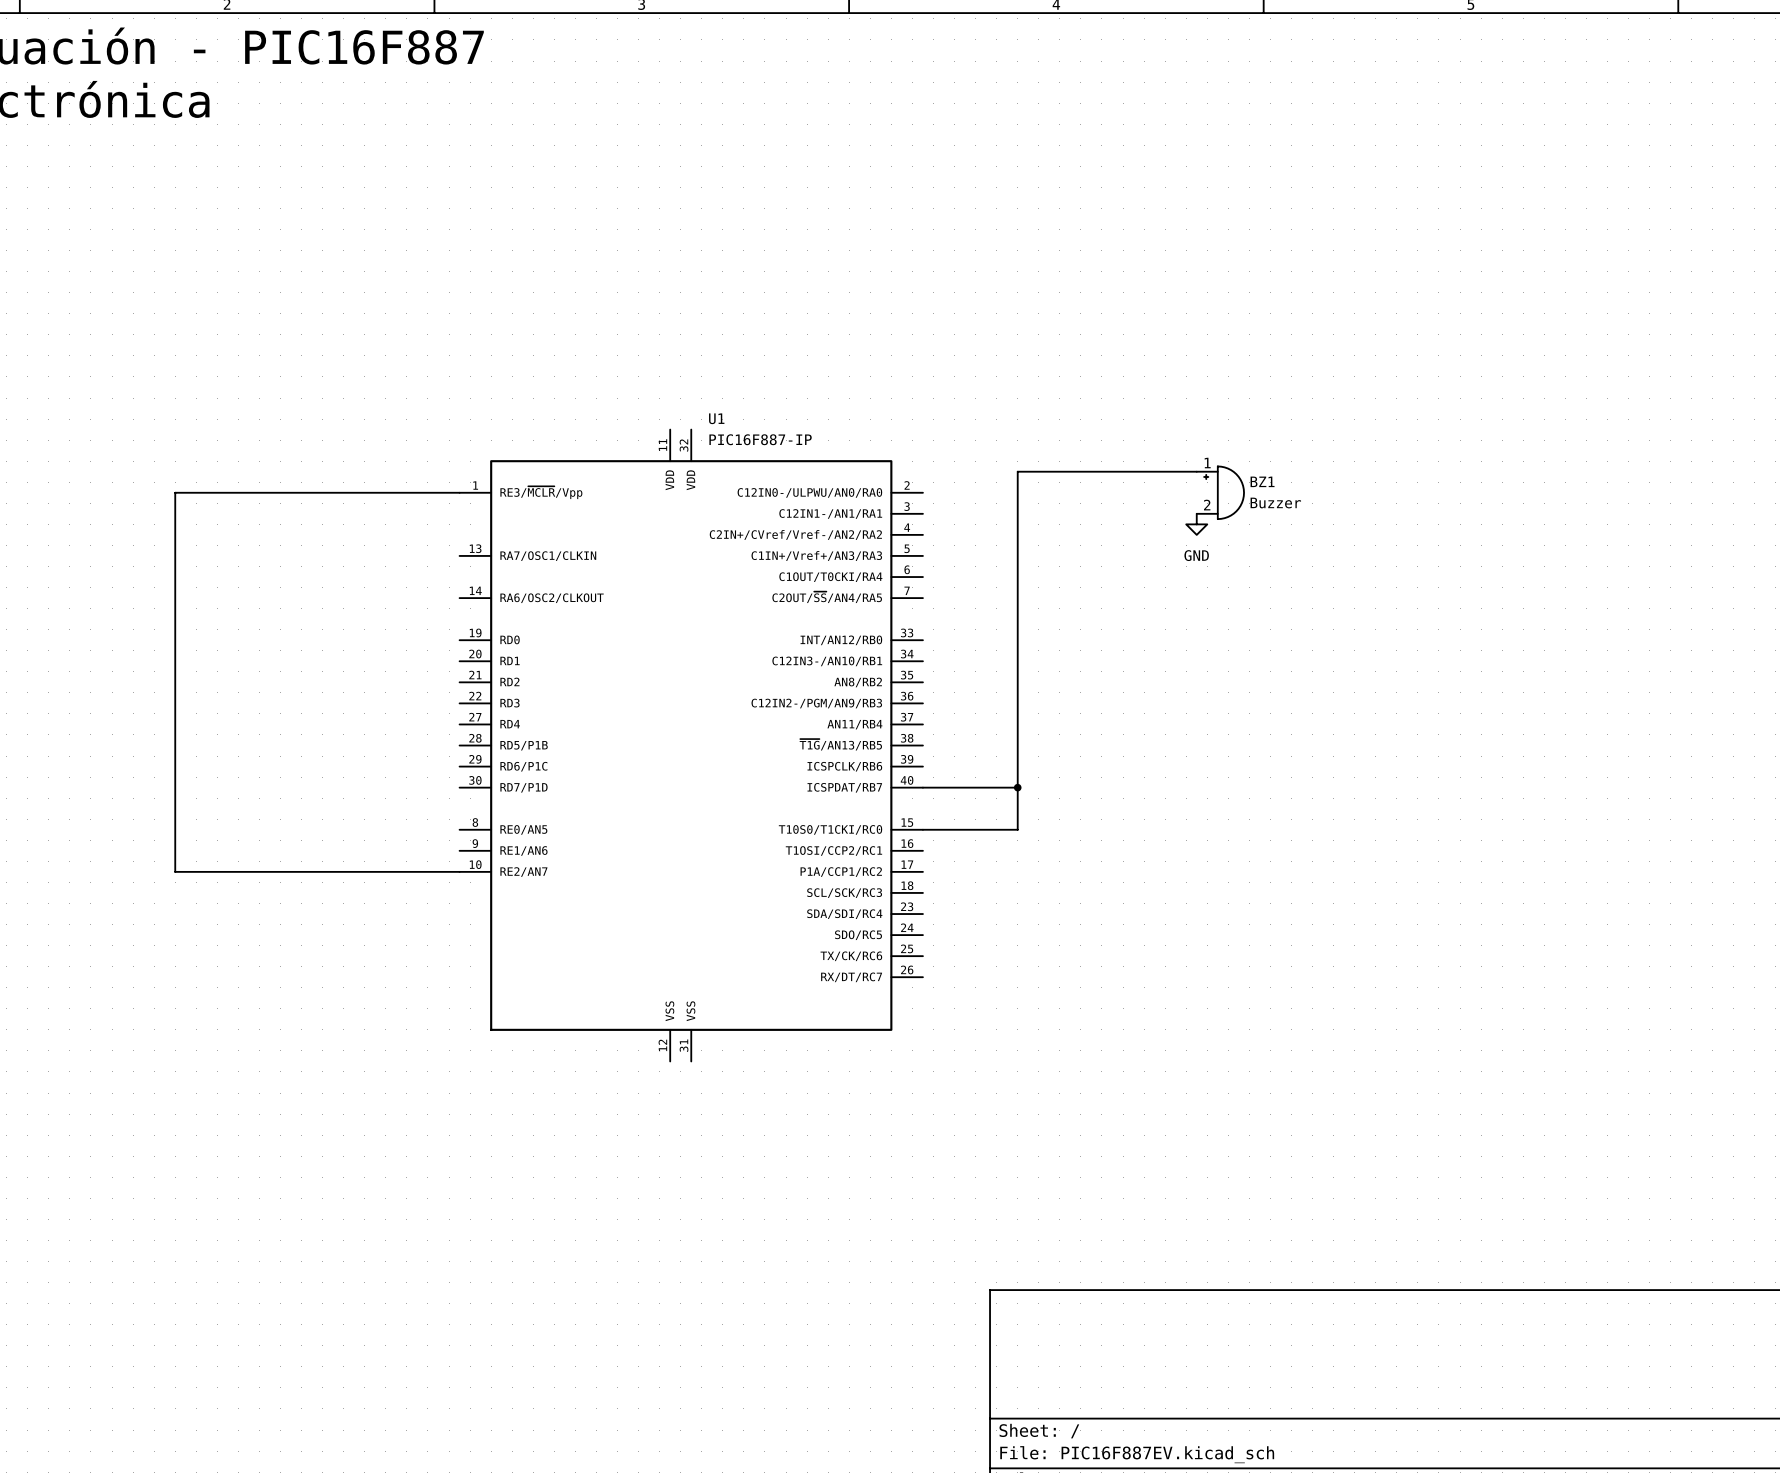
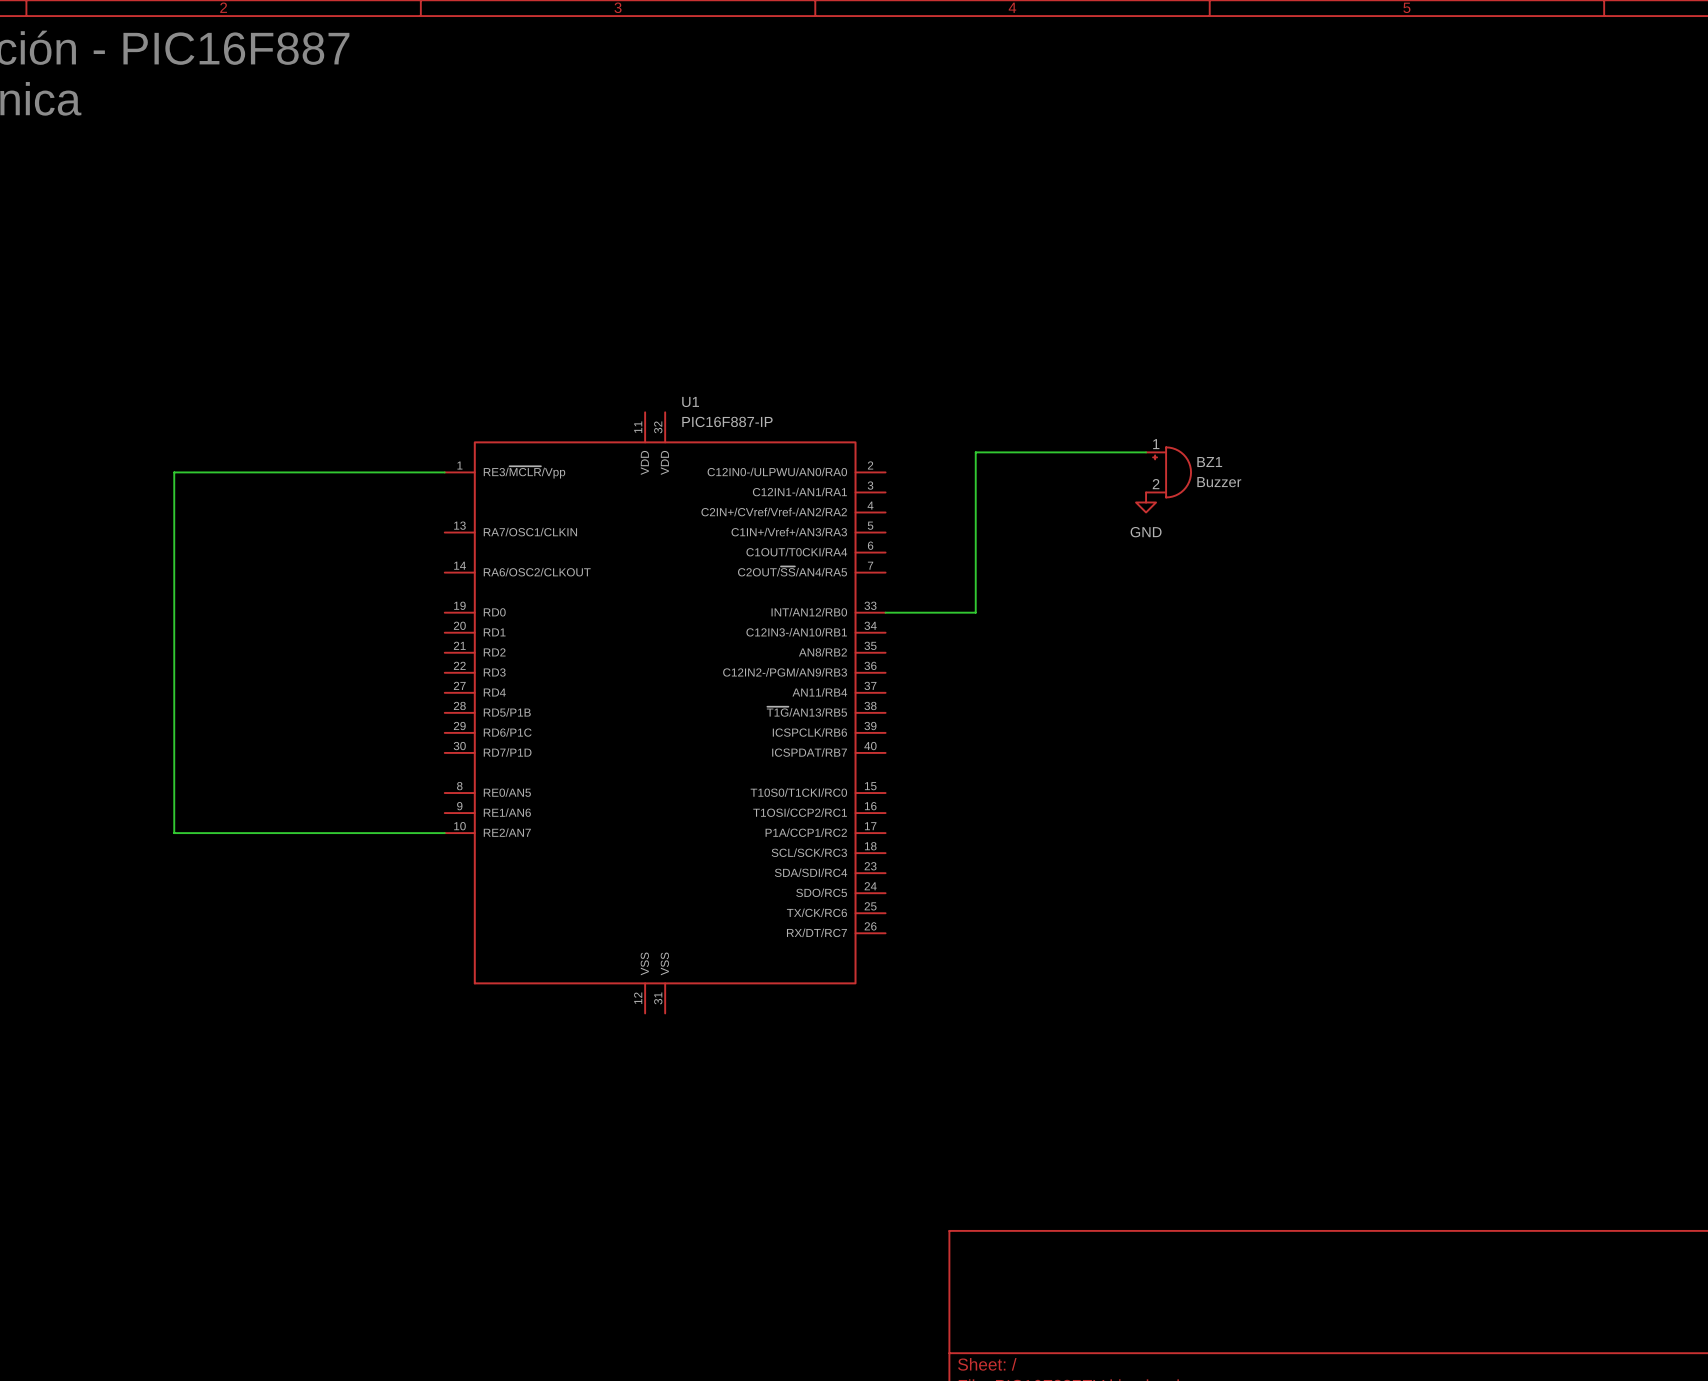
wire: (1017, 640) (1017, 829) (922, 829) -> (975, 612) (885, 612)
wire: (922, 787) (1017, 787) -> none
junction: (1017, 787) -> none

